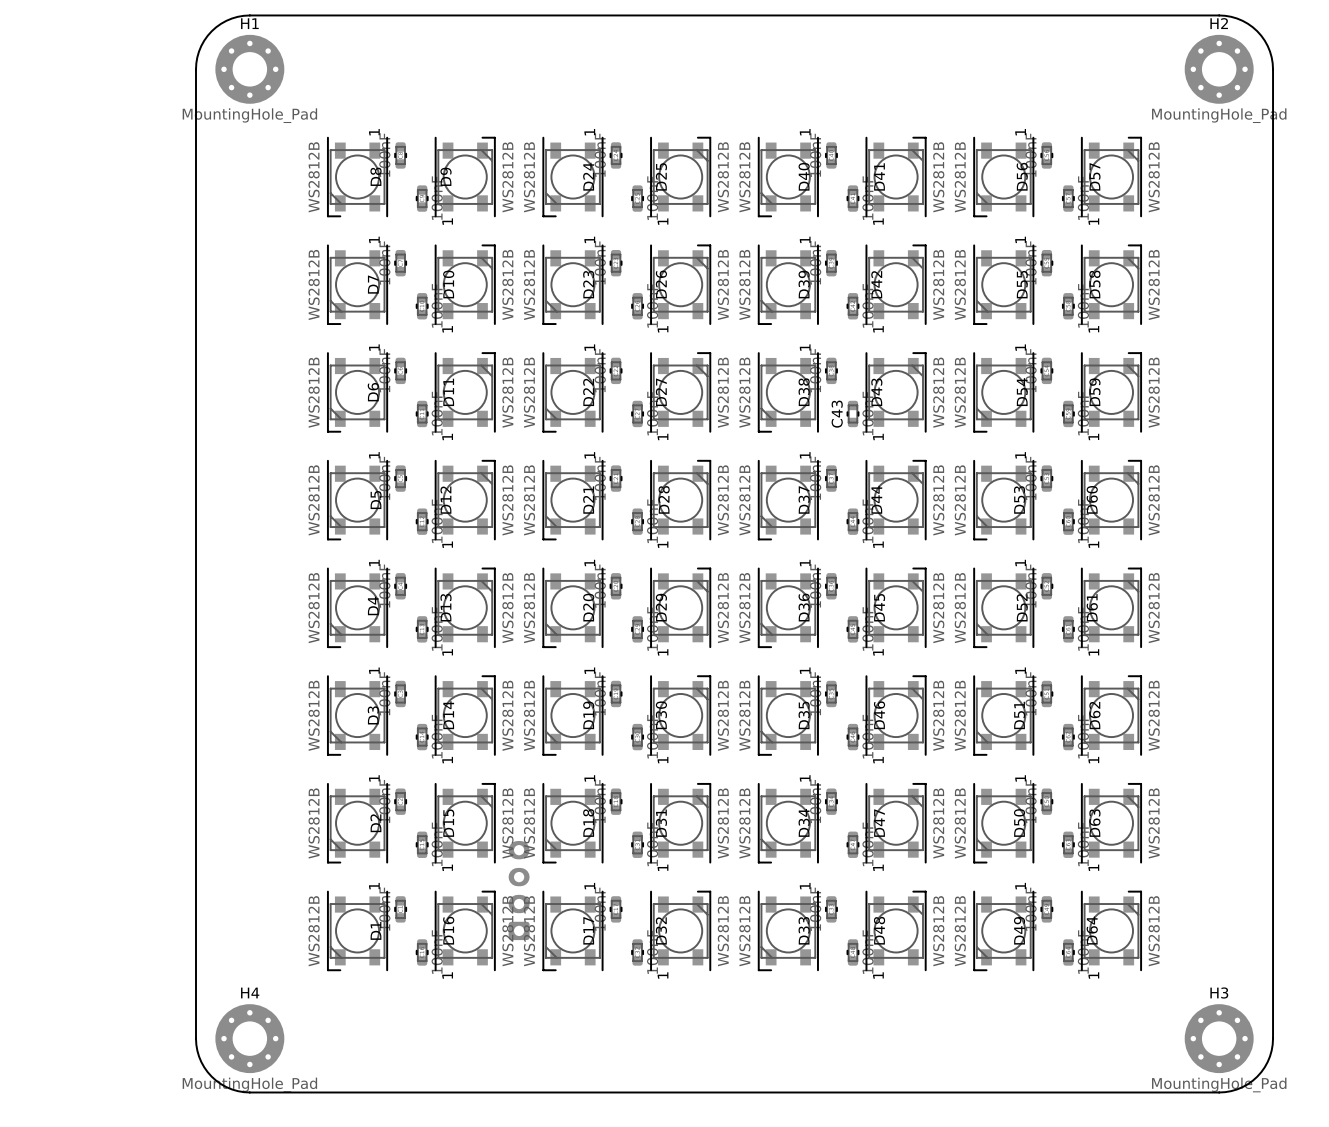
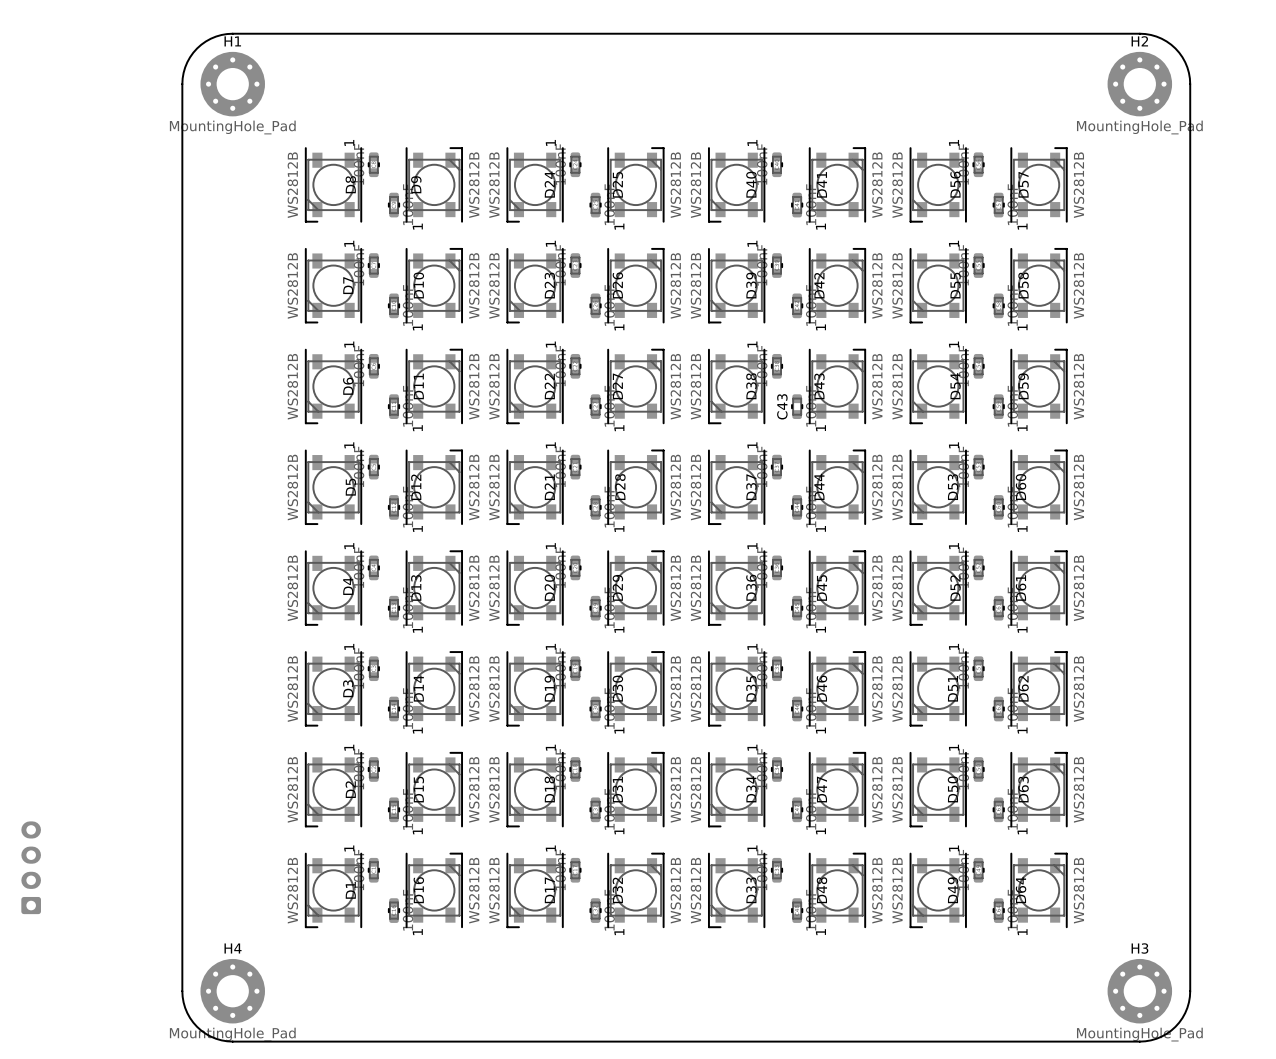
part: (519, 890) -> none
part: none -> (31, 867)

